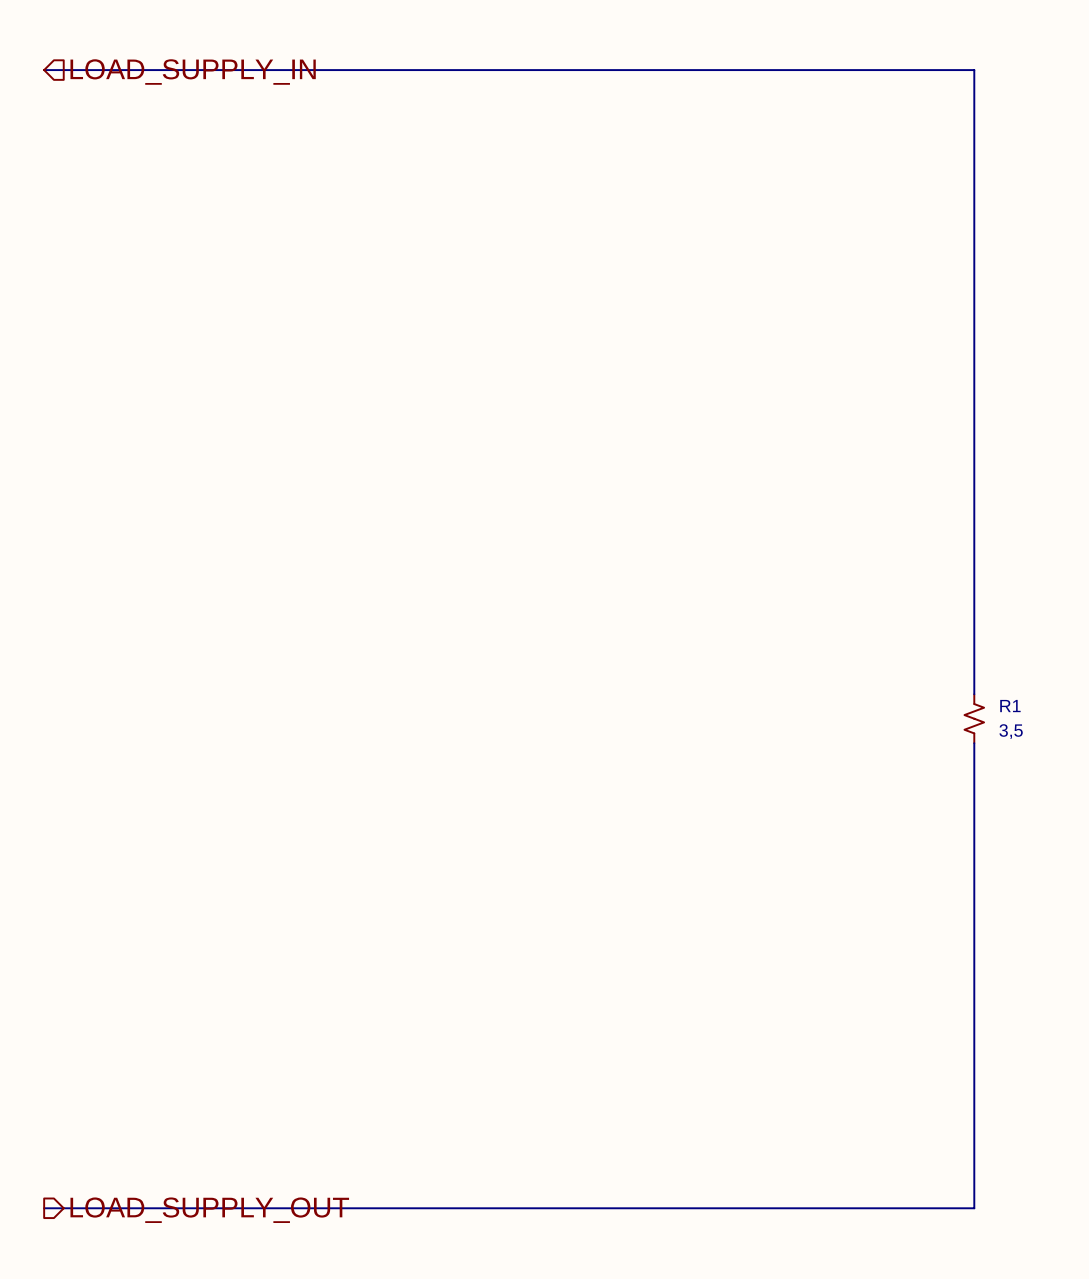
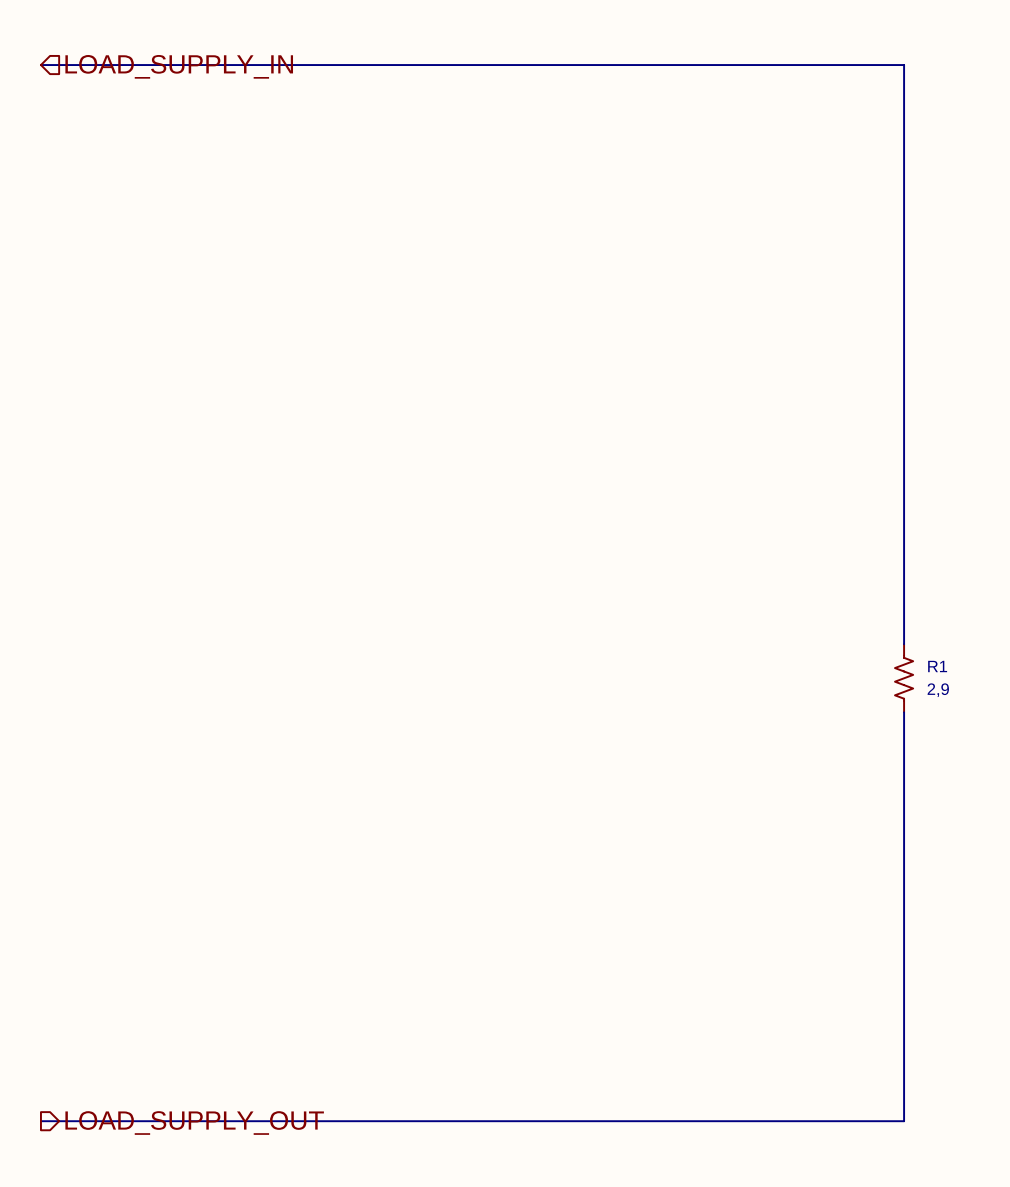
R1 symbol: [964, 694, 985, 744] -> [894, 644, 914, 713]
R1 value: 3,5 (1011, 731) -> 2,9 (938, 690)

